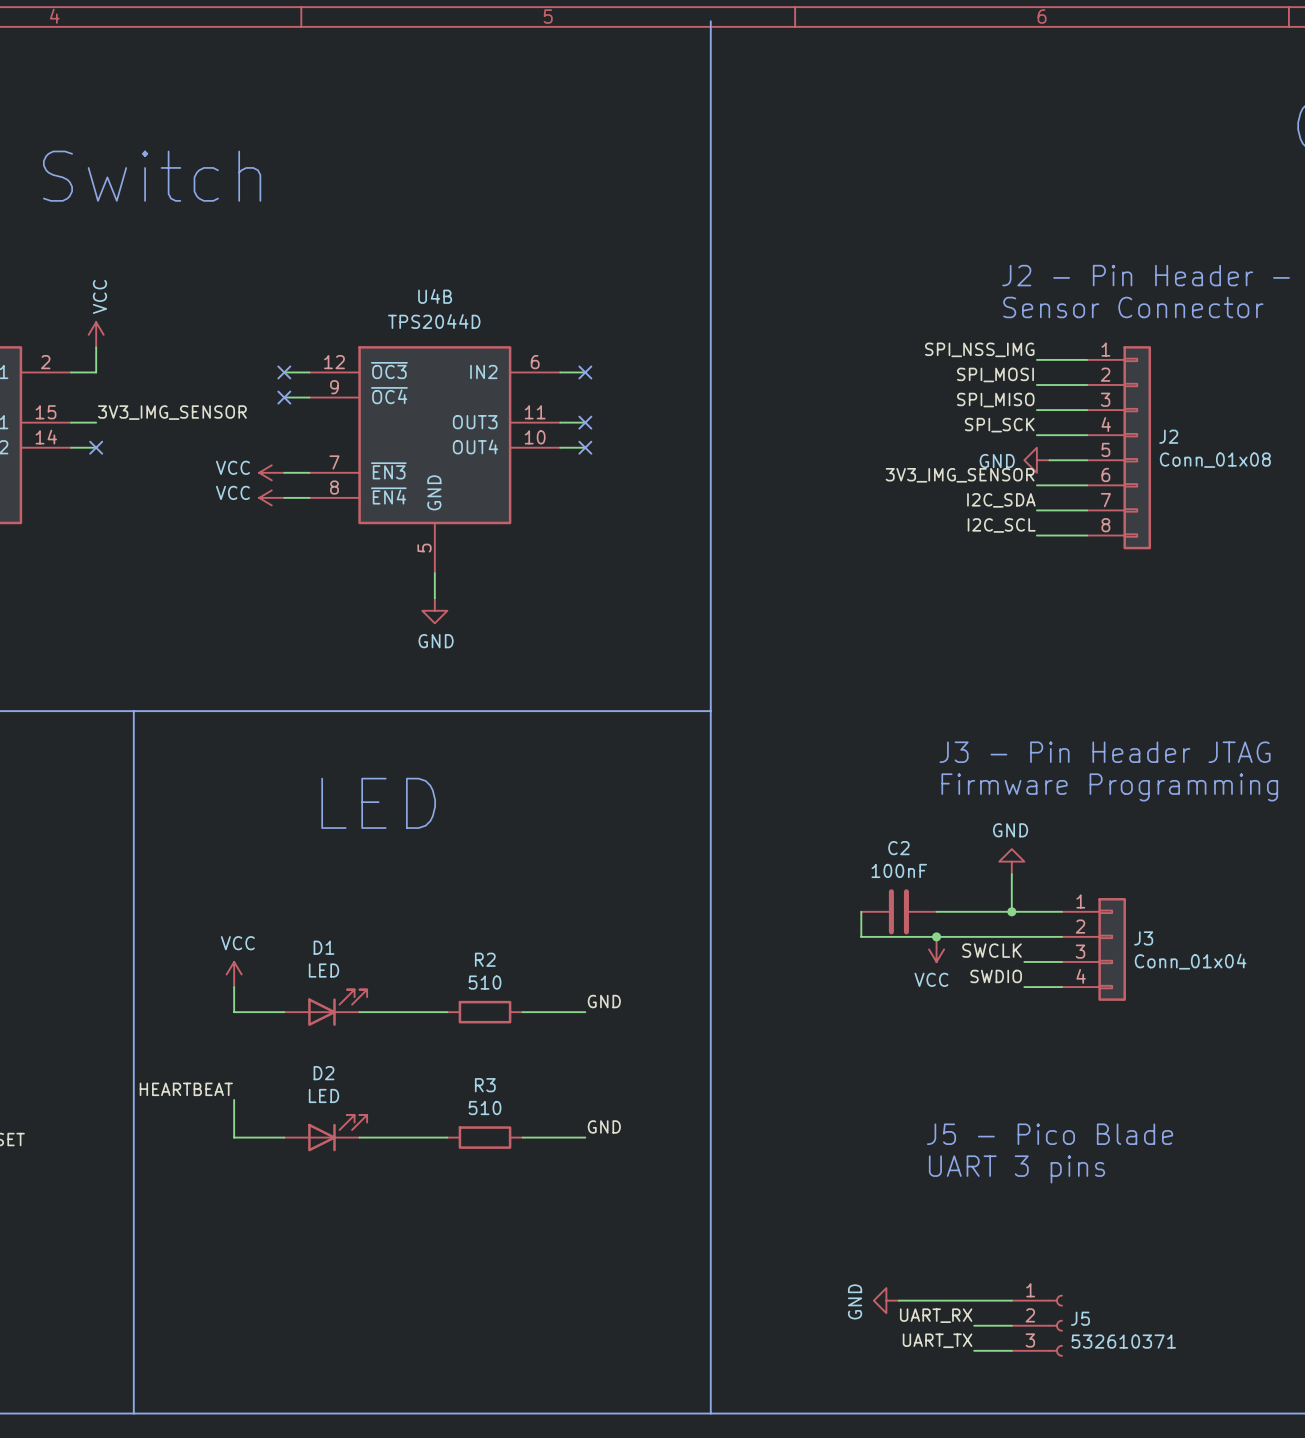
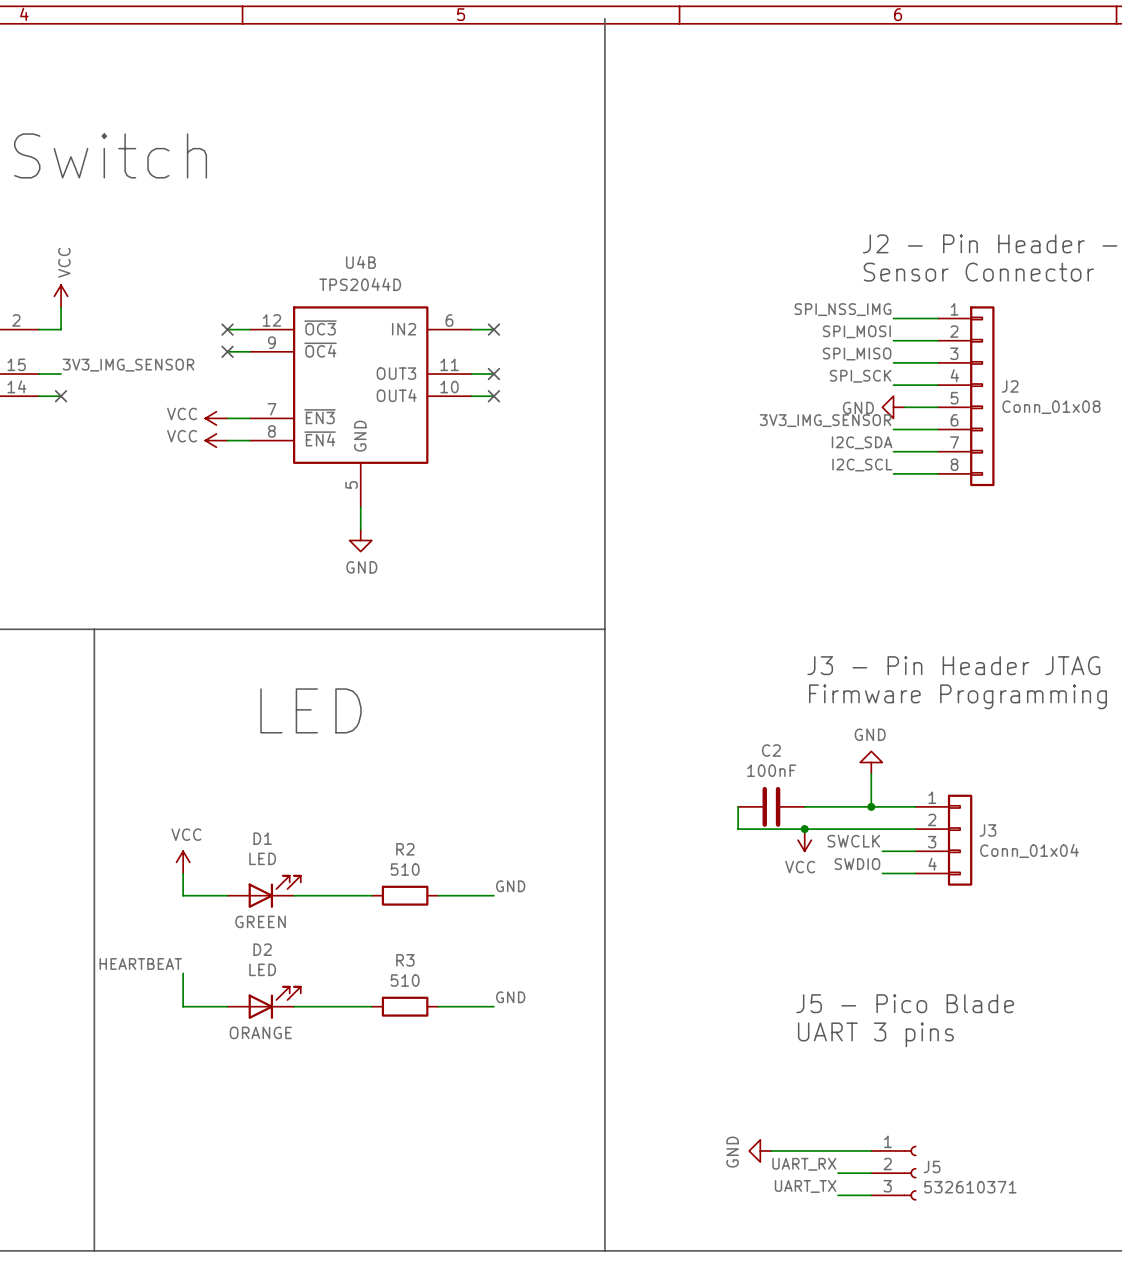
D1 text: none -> GREEN (260, 921)
D2 text: none -> ORANGE (260, 1032)

